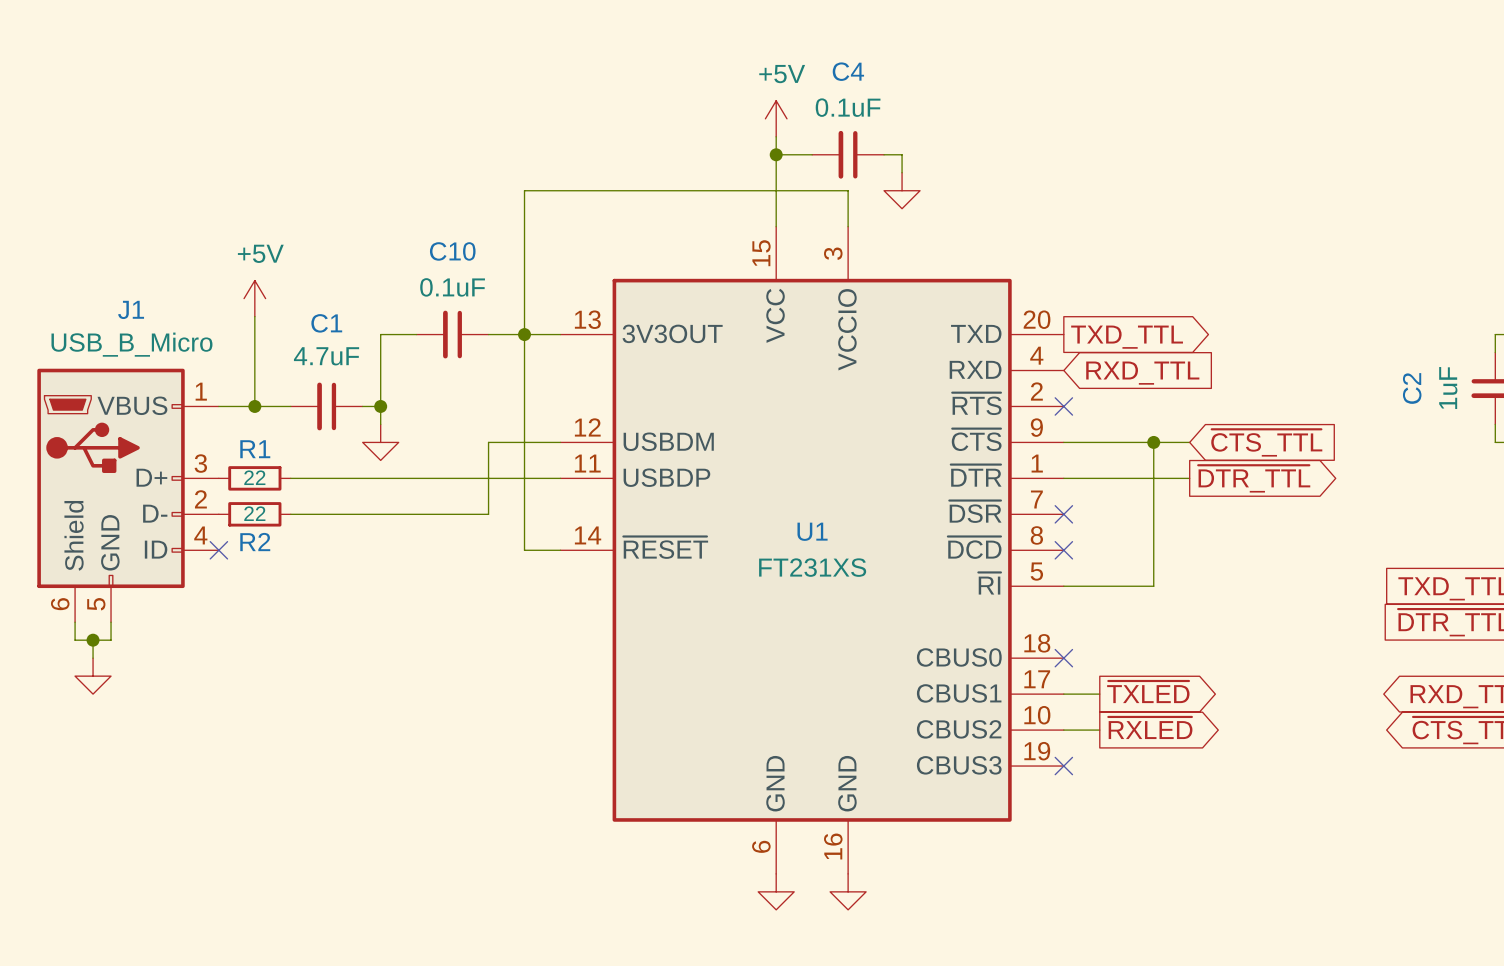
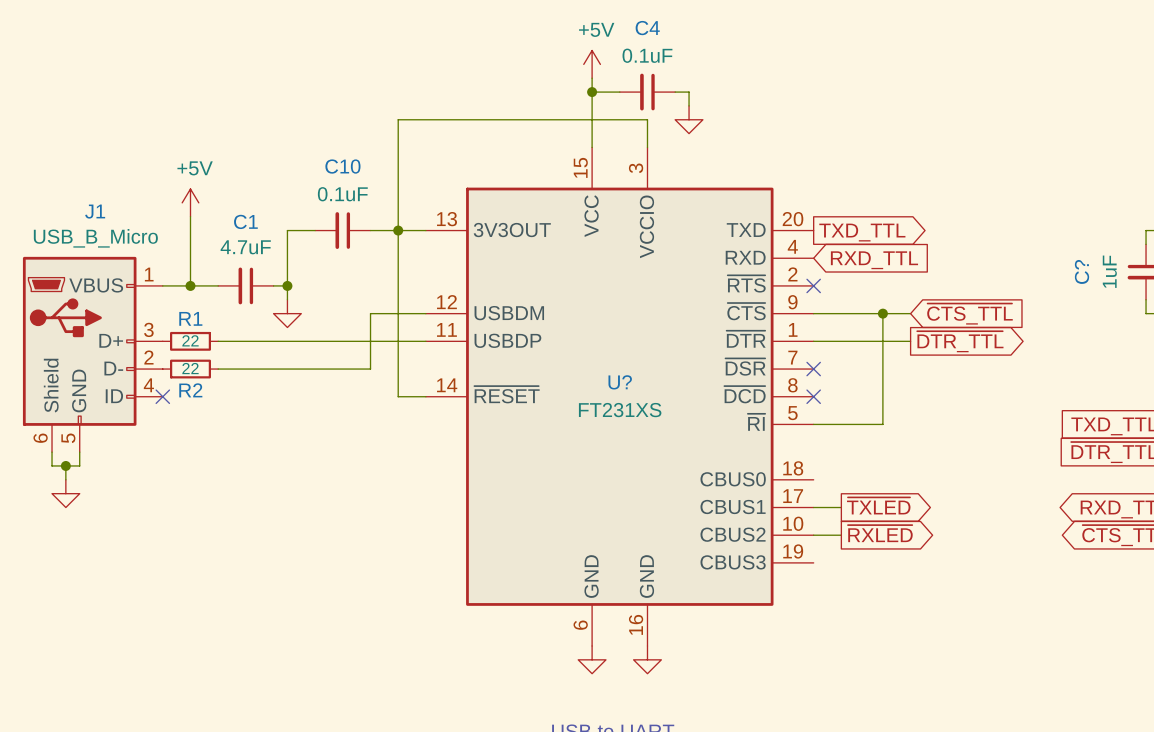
C2 name: C2 (1412, 388) -> C? (1082, 271)
U1 name: U1 (812, 531) -> U? (620, 382)
no-connect mark: (1063, 658) -> none
no-connect mark: (1063, 766) -> none

